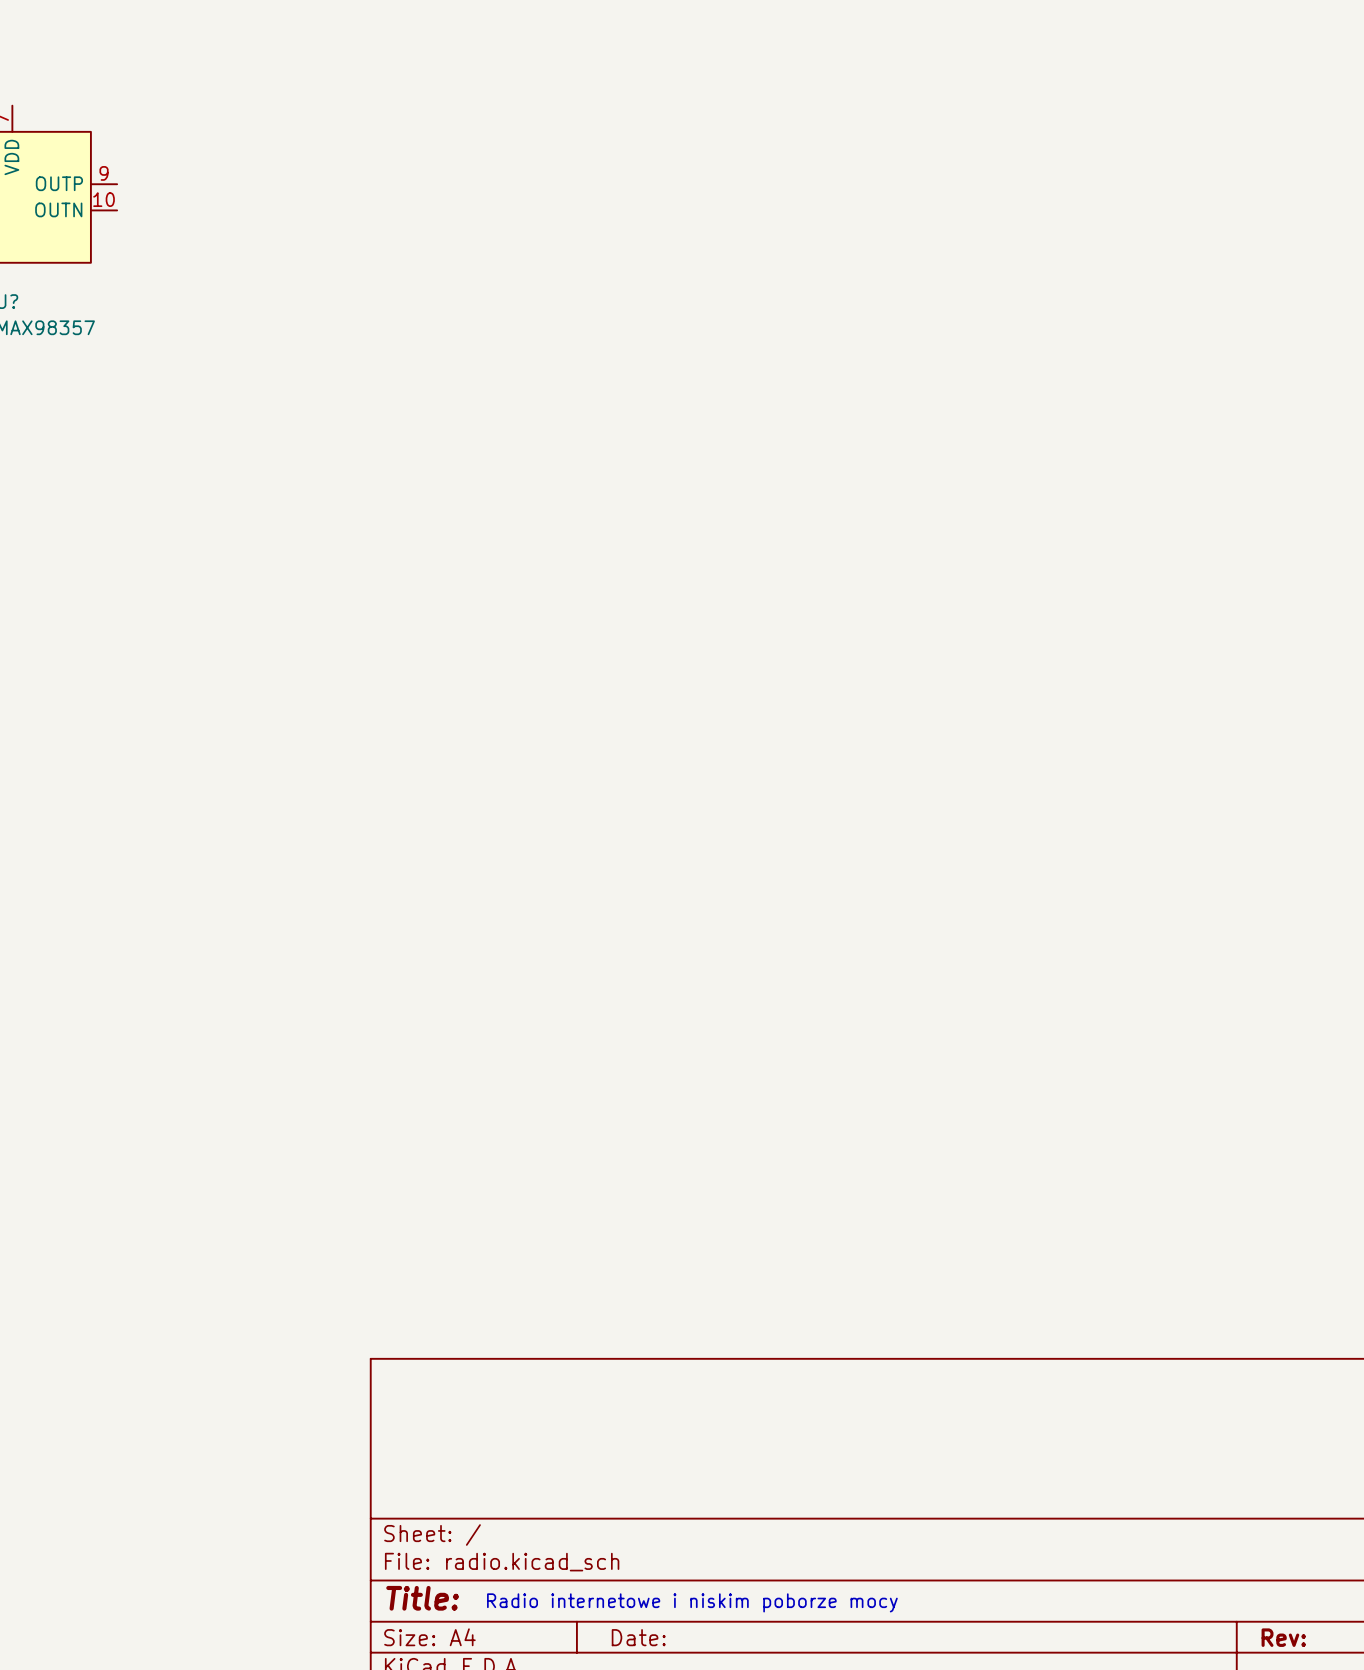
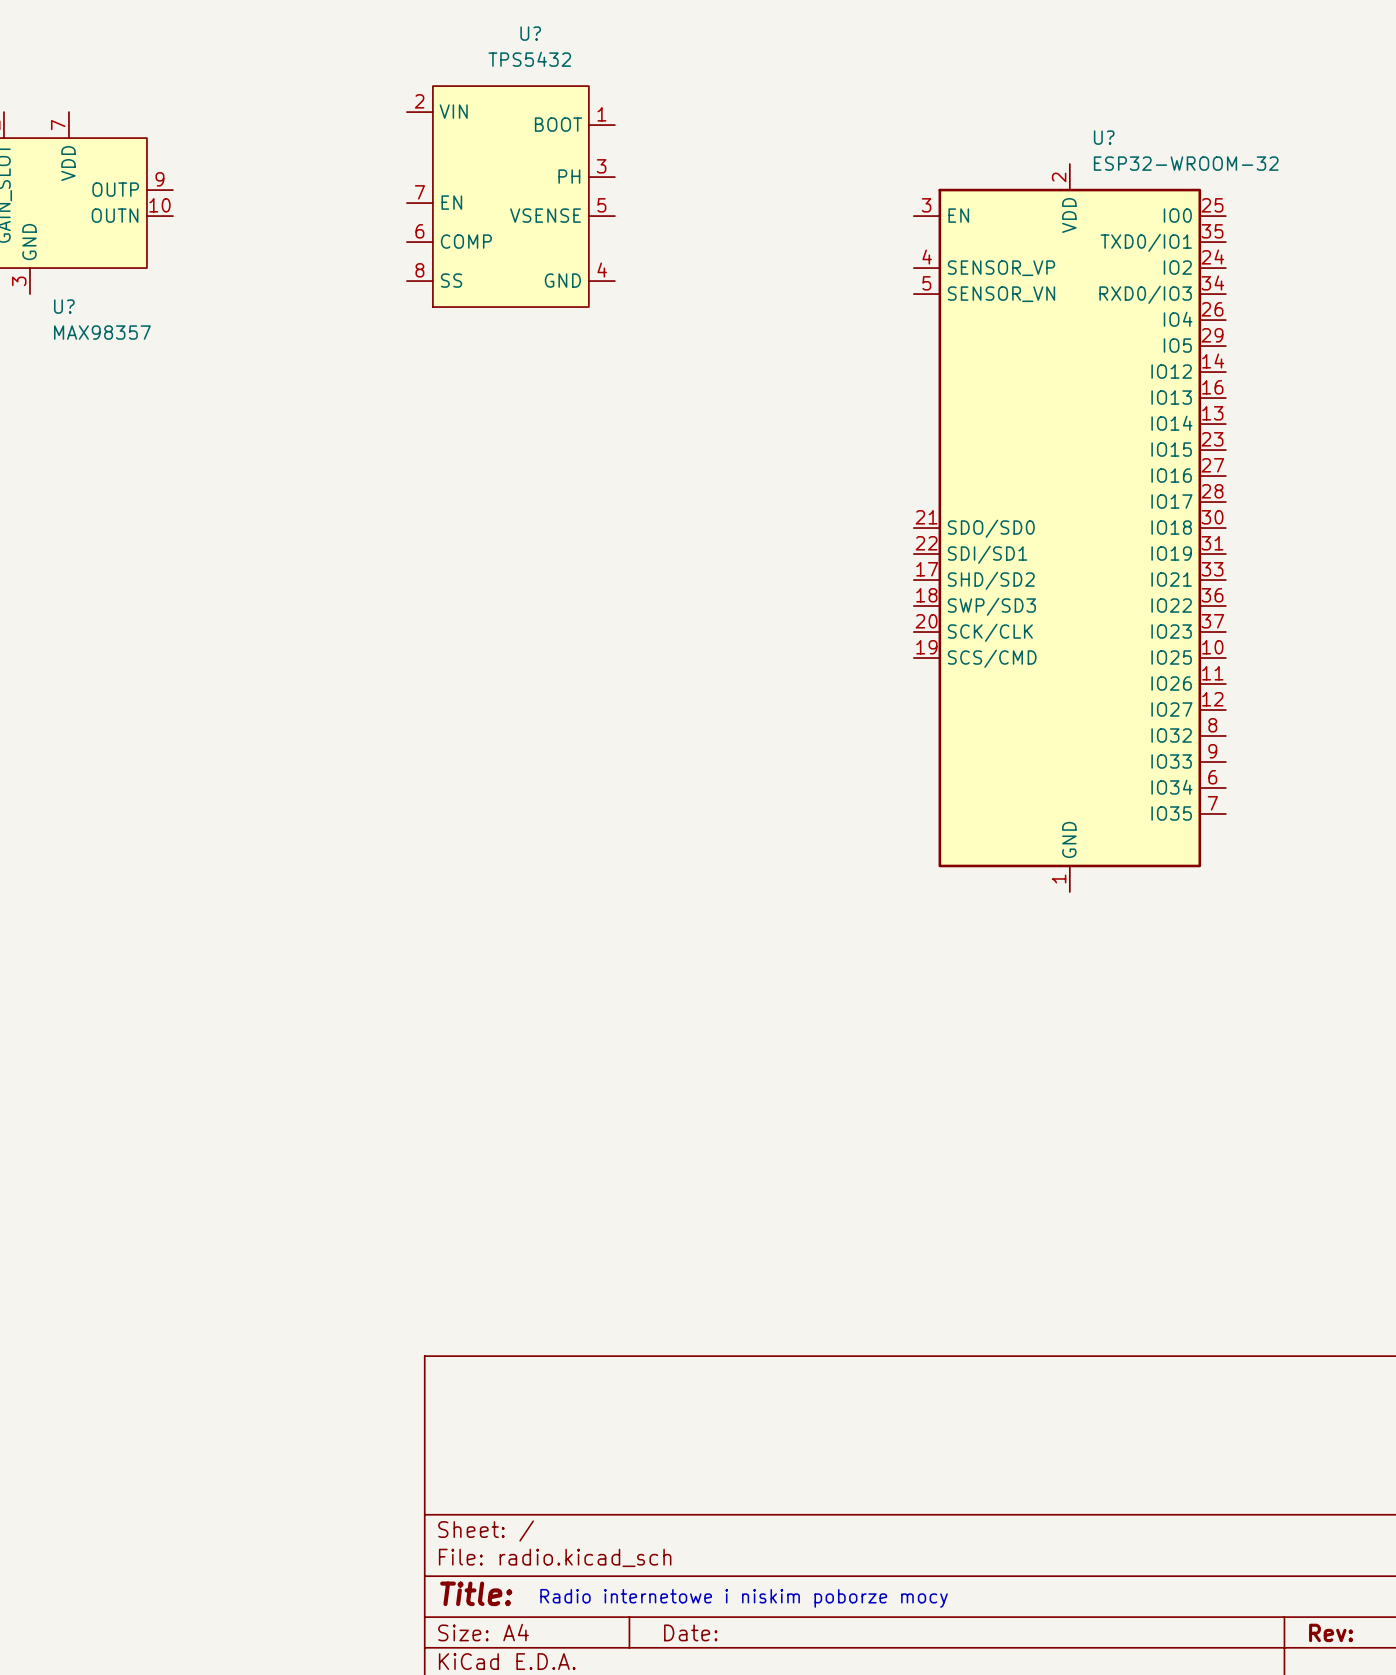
U?: none -> TPS5432 (517, 196)
U?: none -> ESP32-WROOM-32 (1069, 528)

